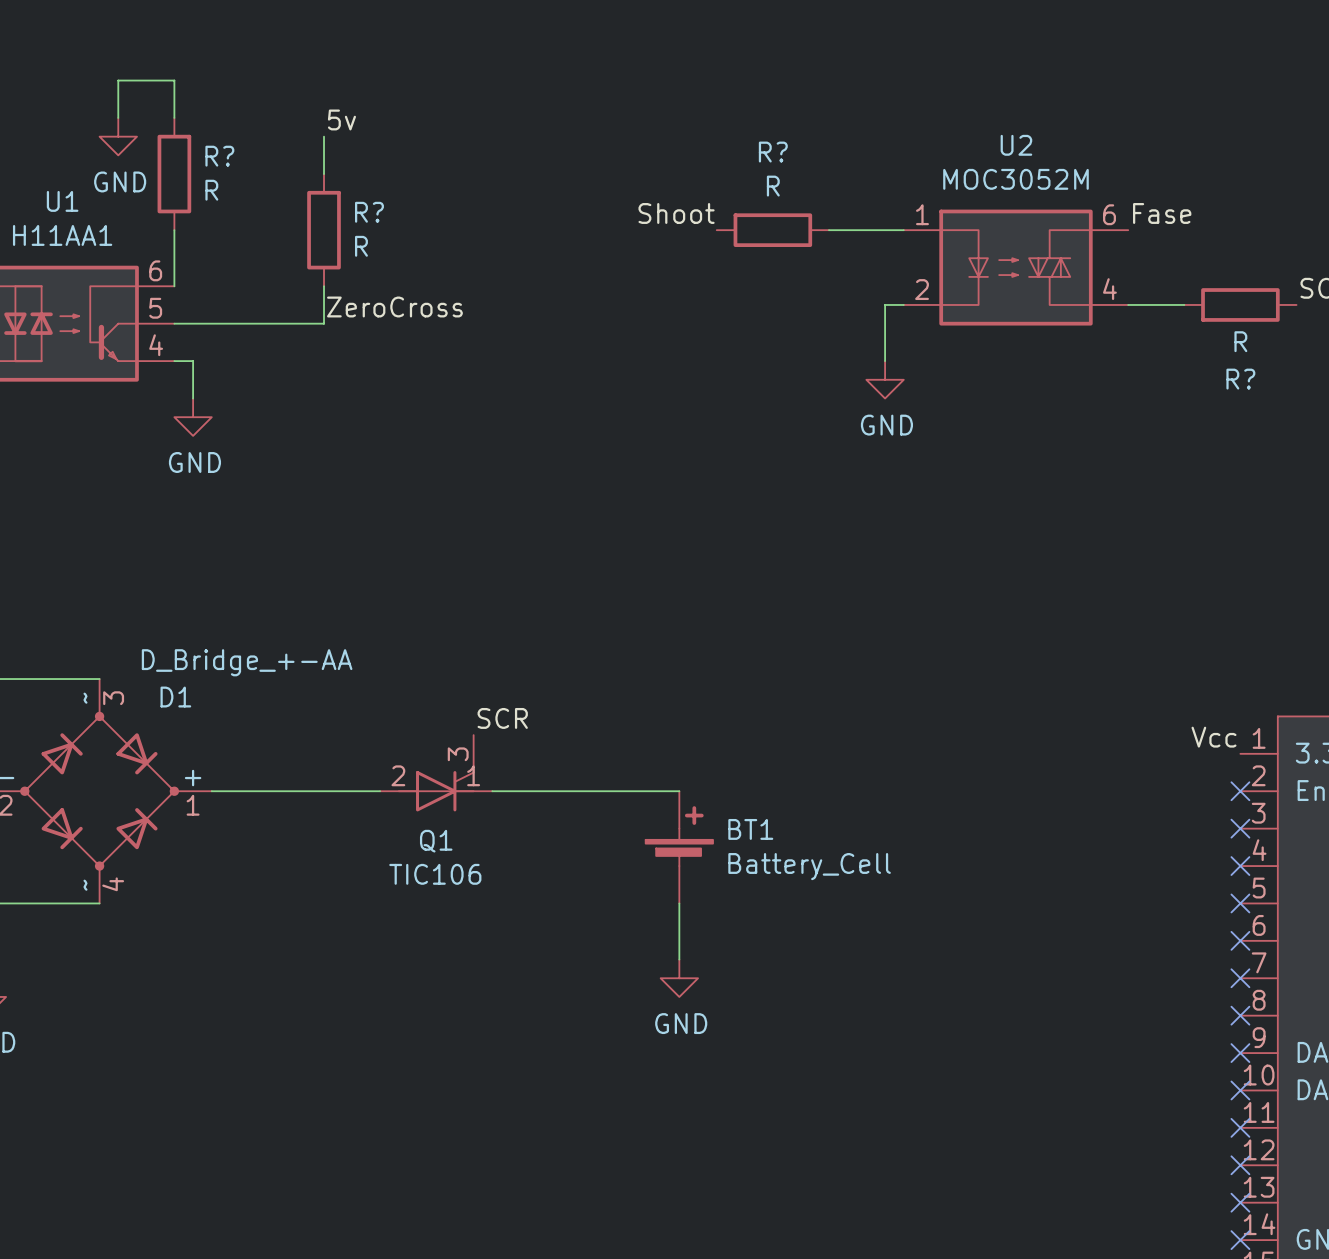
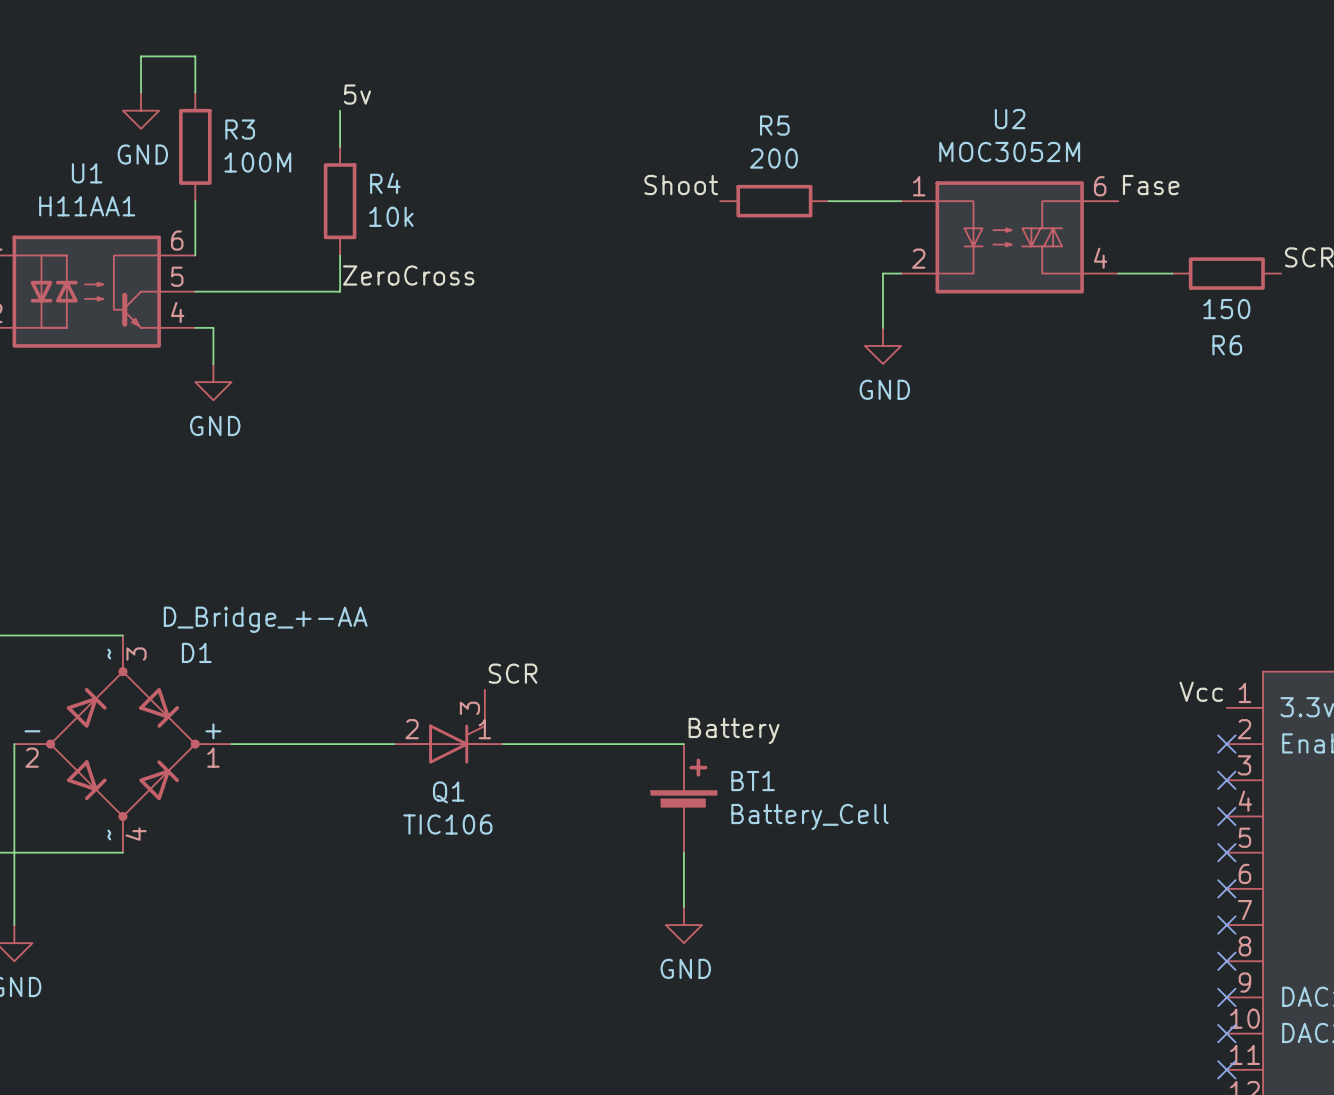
R? name: R? (773, 152) -> R5 (774, 125)
R? name: R? (219, 156) -> R3 (240, 129)
R? value: R (773, 186) -> 200 (773, 158)
R? value: R (211, 190) -> 100M (257, 162)
R? name: R? (369, 212) -> R4 (385, 183)
R? value: R (361, 246) -> 10k (391, 216)
R? value: R (1240, 341) -> 150 (1226, 309)
R? name: R? (1240, 379) -> R6 (1227, 345)
label: none -> Battery (734, 730)

